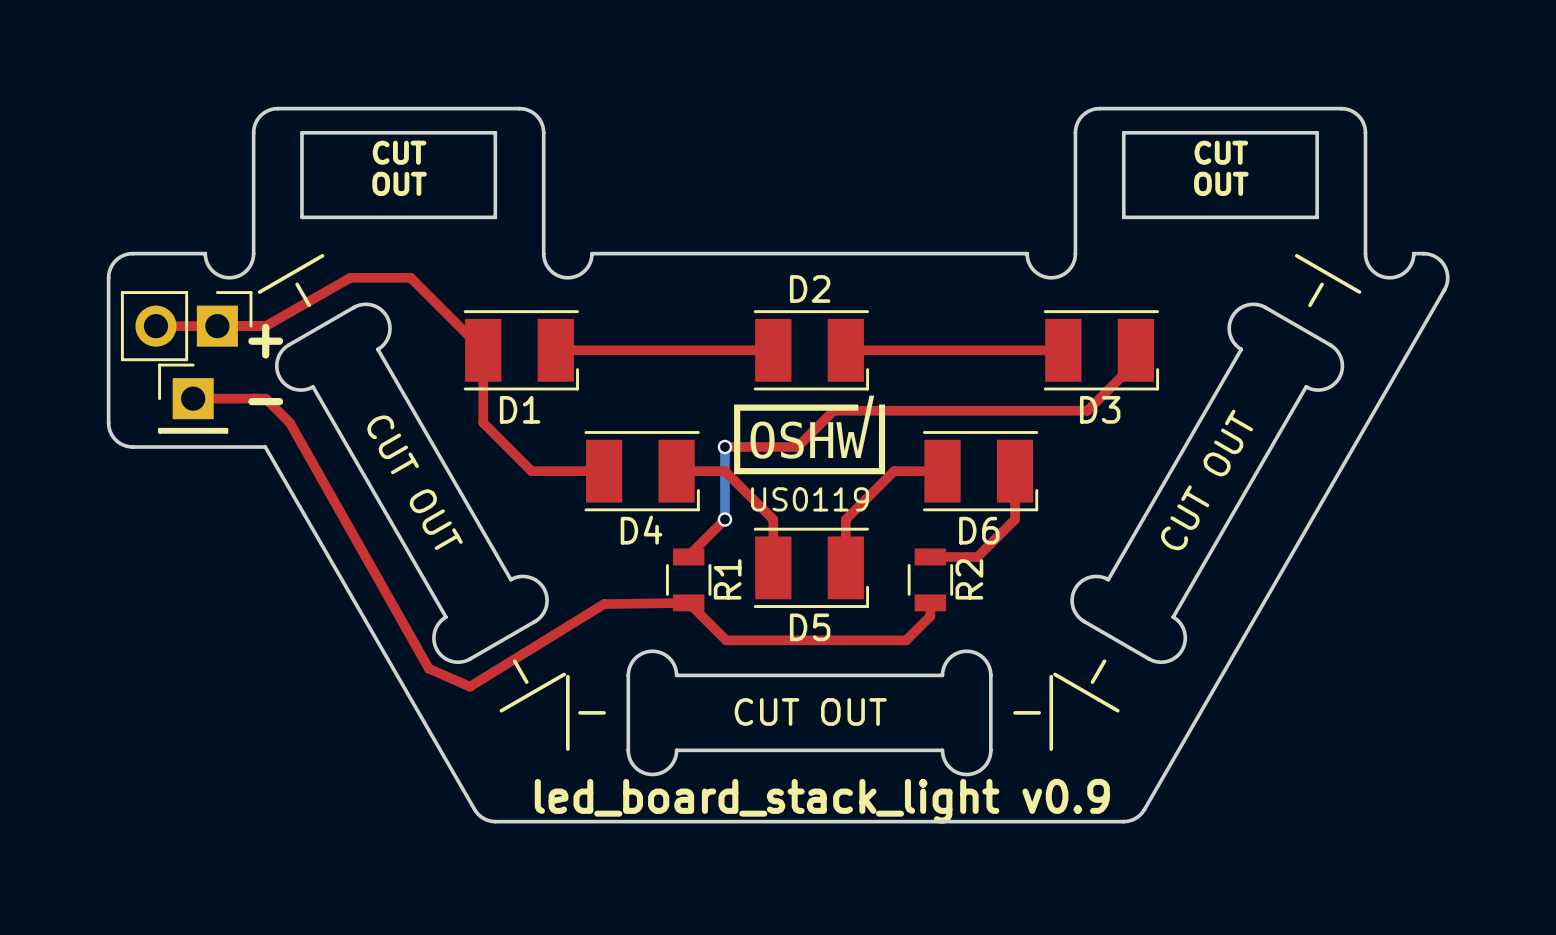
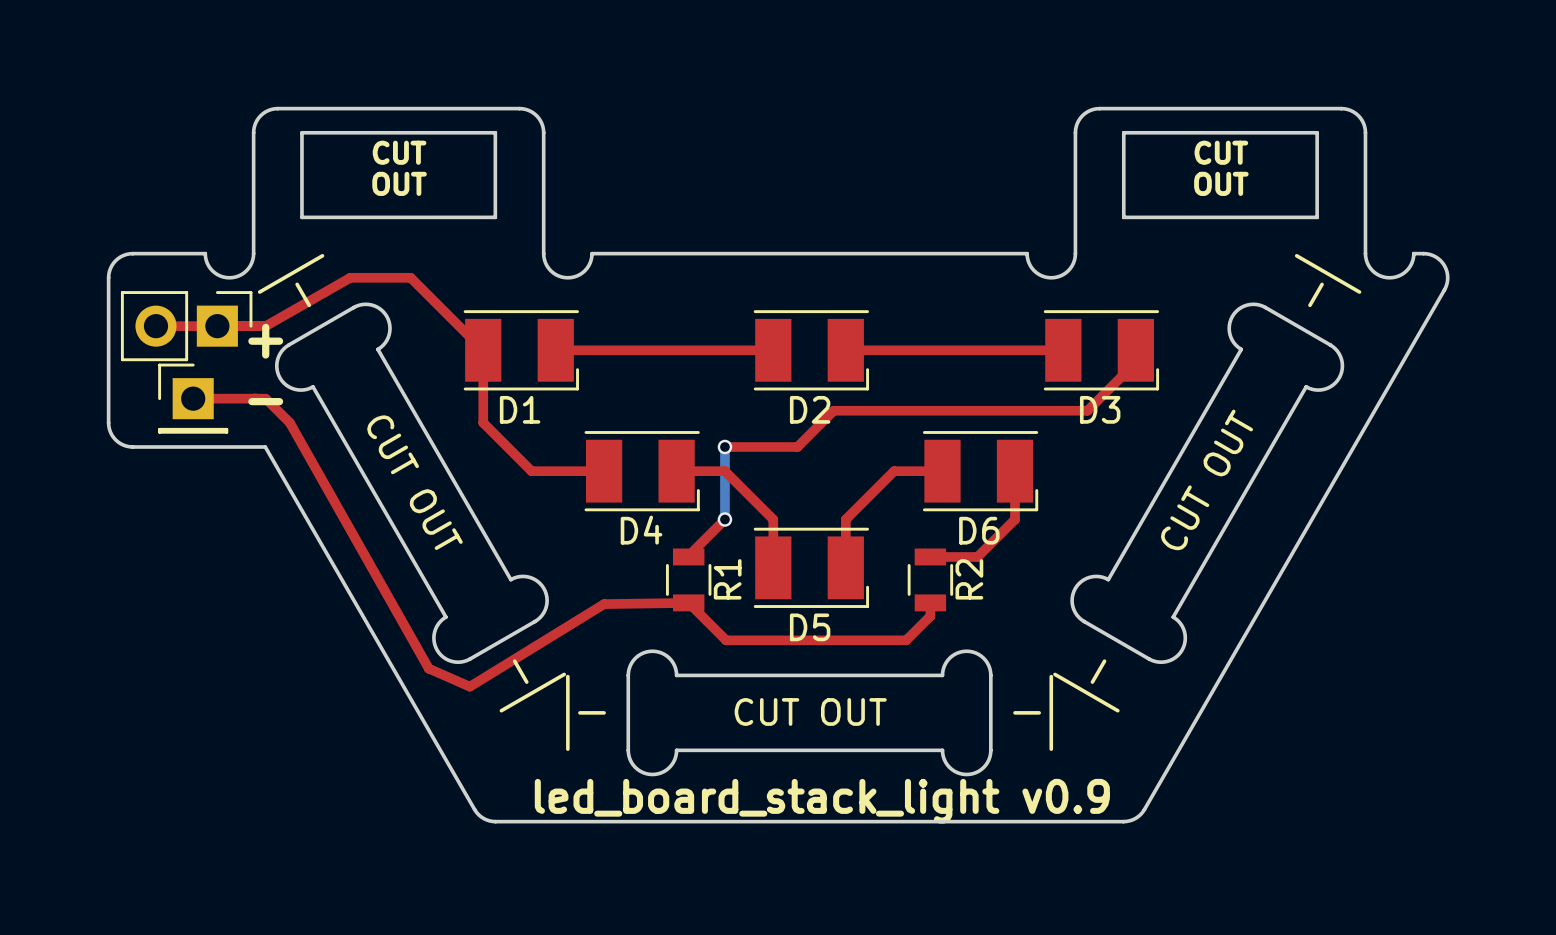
D2 name position: D2 (810, 288) -> D2 (810, 409)
drawing: [734, 395, 886, 475] -> none

